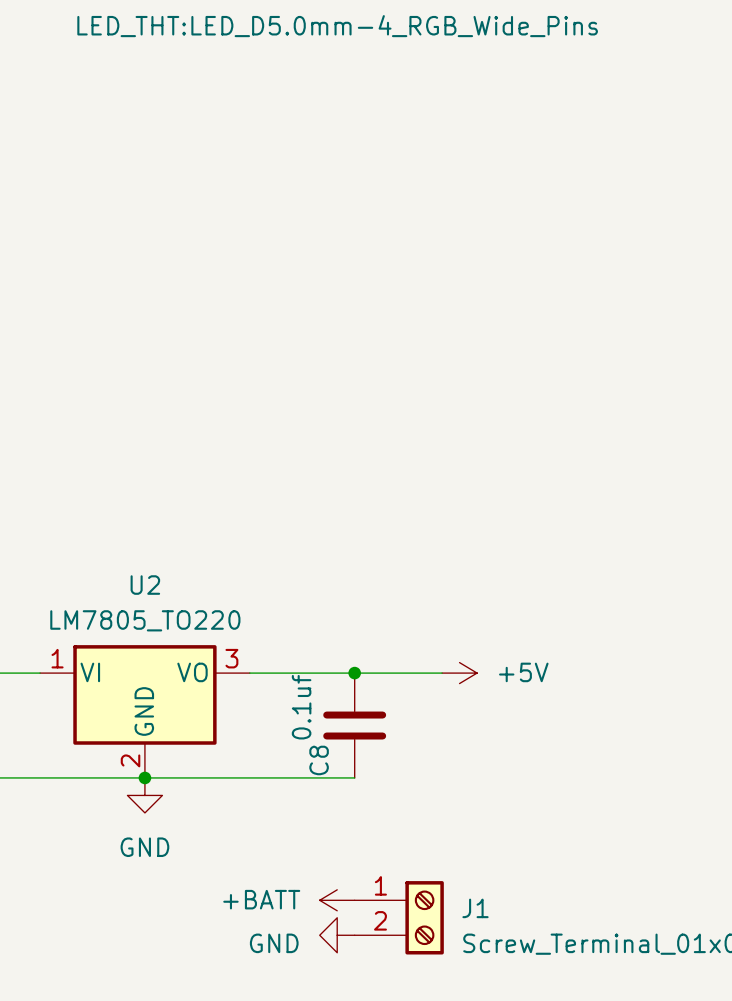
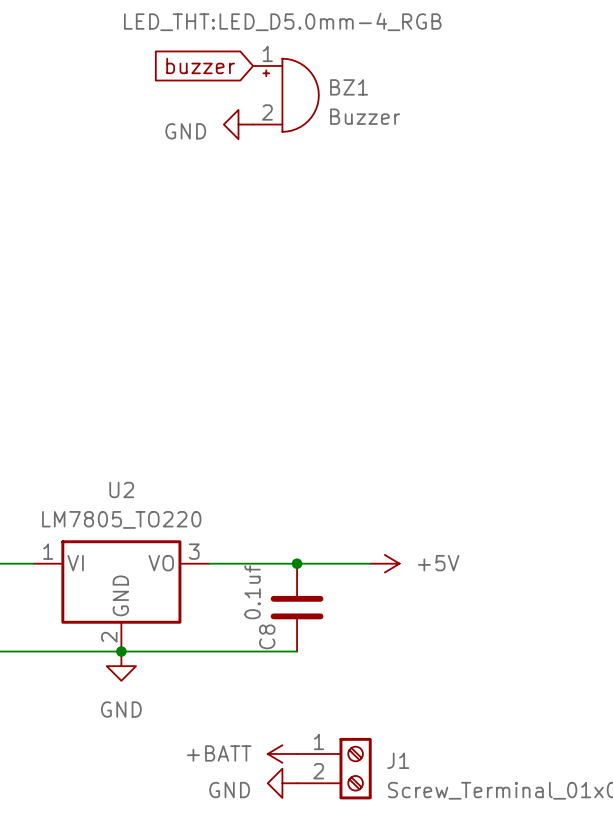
part text: LED_THT:LED_D5.0mm-4_RGB_Wide_Pins (337, 26) -> LED_THT:LED_D5.0mm-4_RGB (282, 21)
global label: none -> buzzer (200, 65)
BZ1: none -> Buzzer (285, 95)
power symbol: none -> GND (238, 124)

